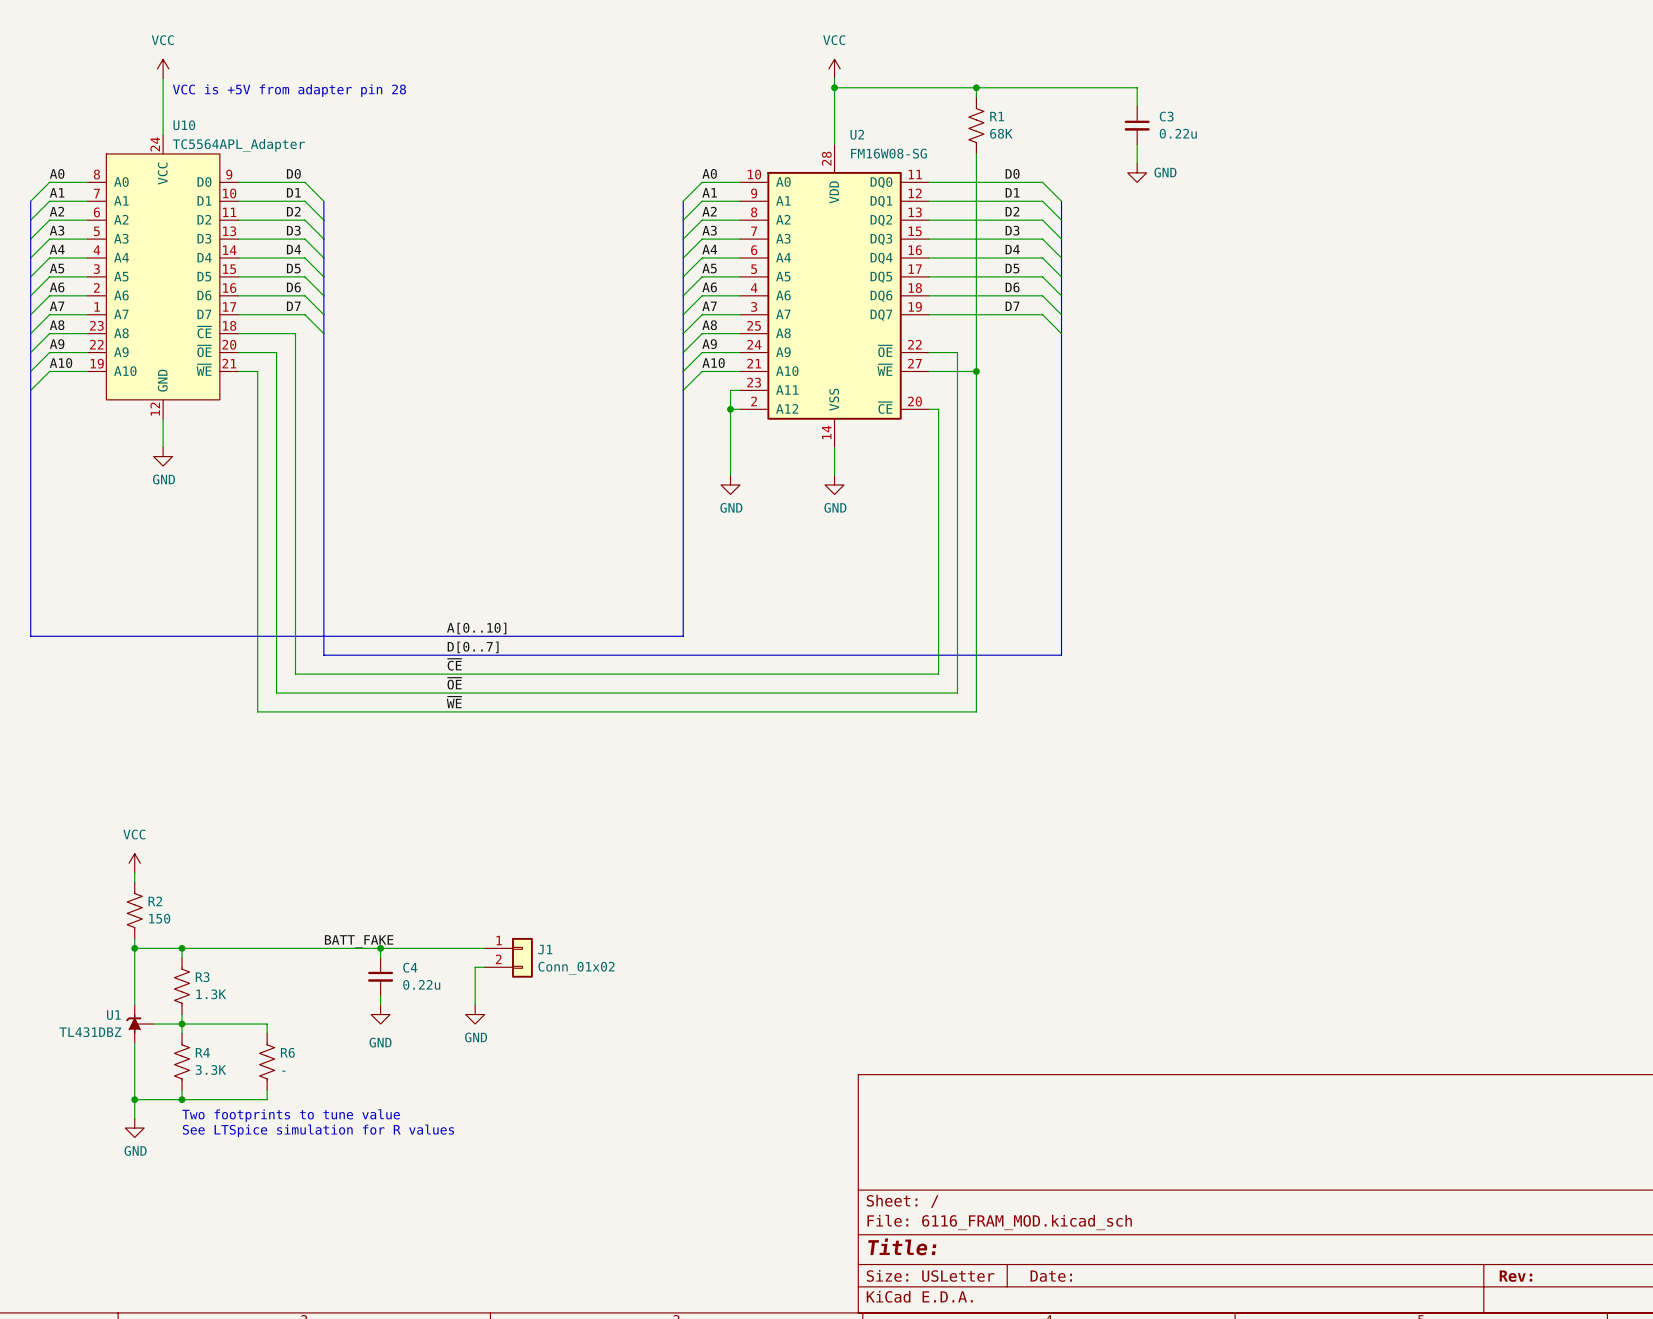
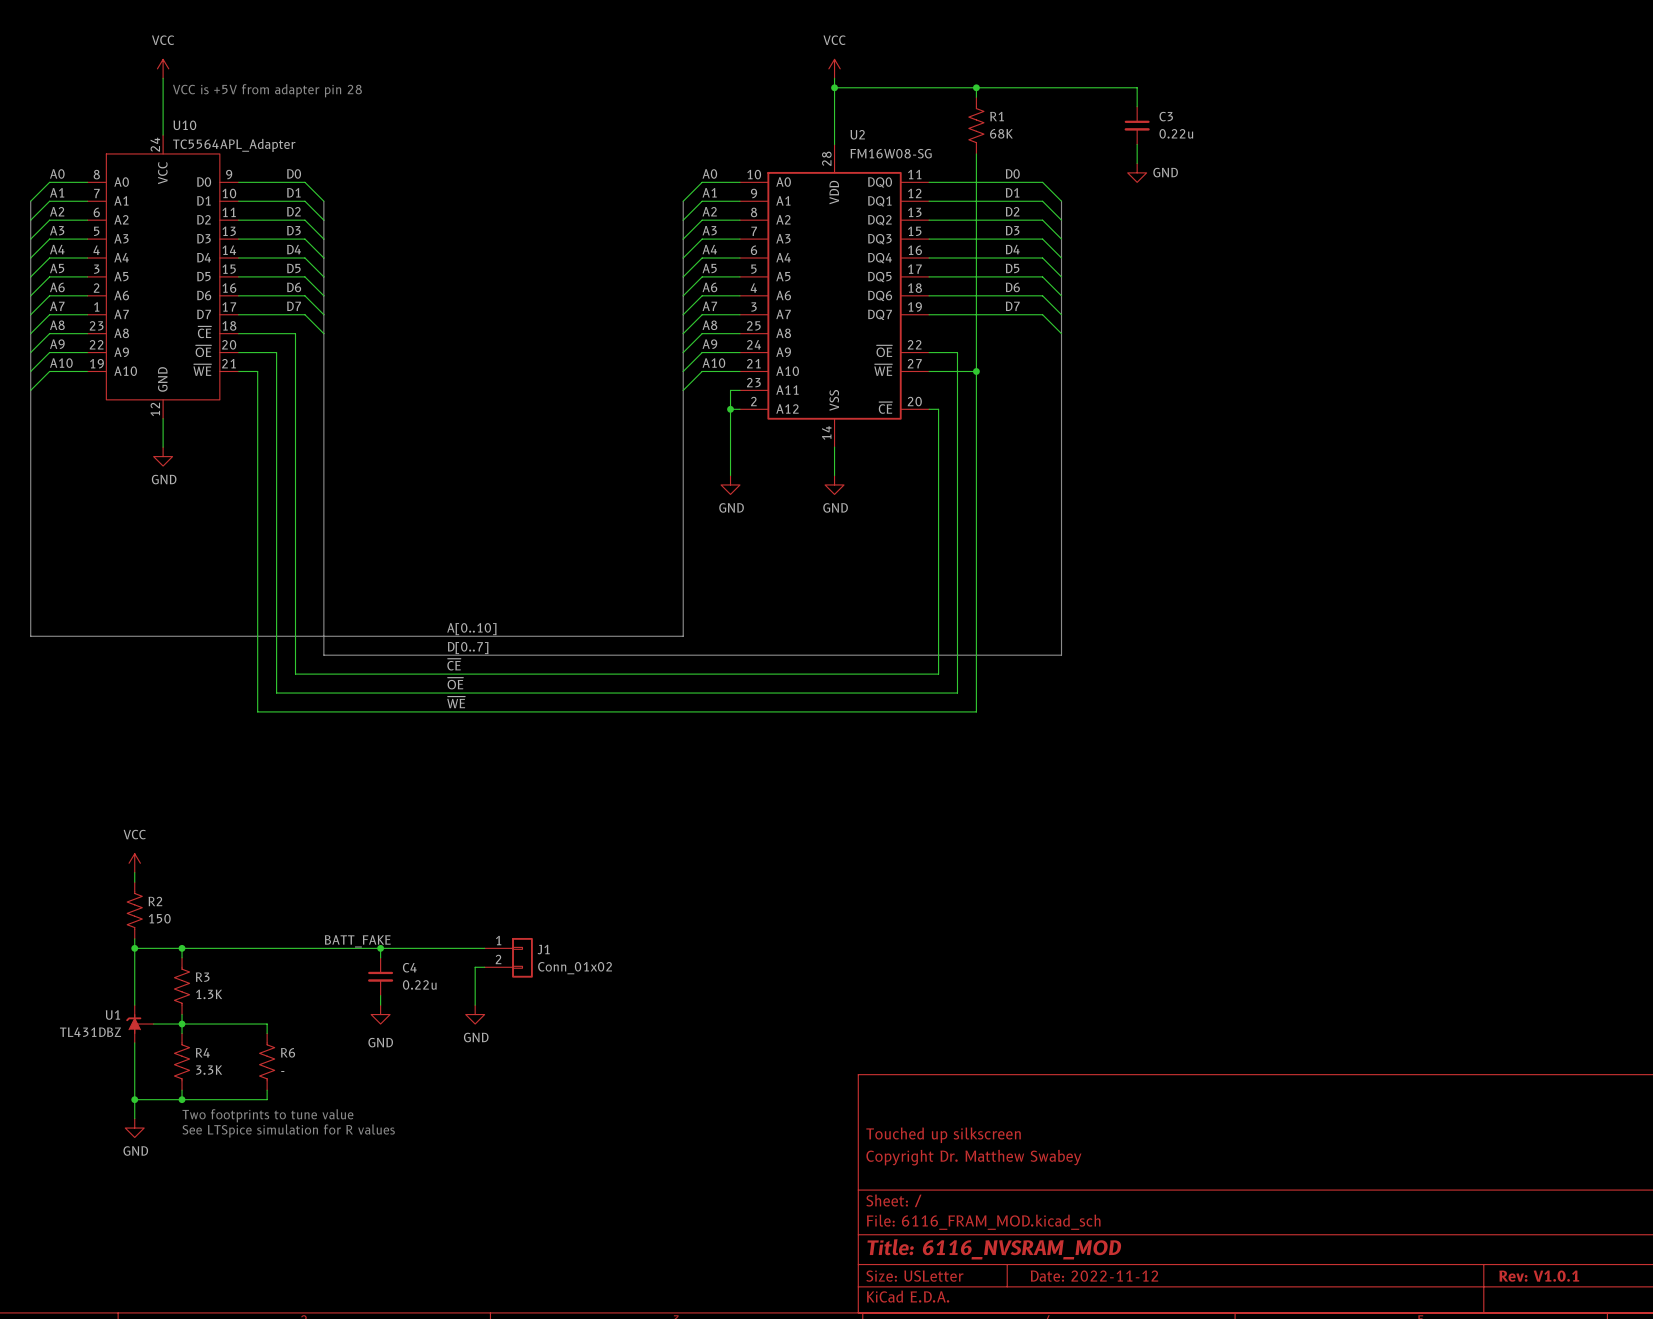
title block: none -> Touched up silkscreen (943, 1135)
title block: none -> Copyright Dr. Matthew Swabey (973, 1157)
title block: Title: (902, 1246) -> Title: 6116_NVSRAM_MOD (994, 1249)
title block: Date: (1051, 1276) -> Date: 2022-11-12 (1094, 1276)
title block: Rev: (1515, 1276) -> Rev: V1.0.1 (1539, 1276)

